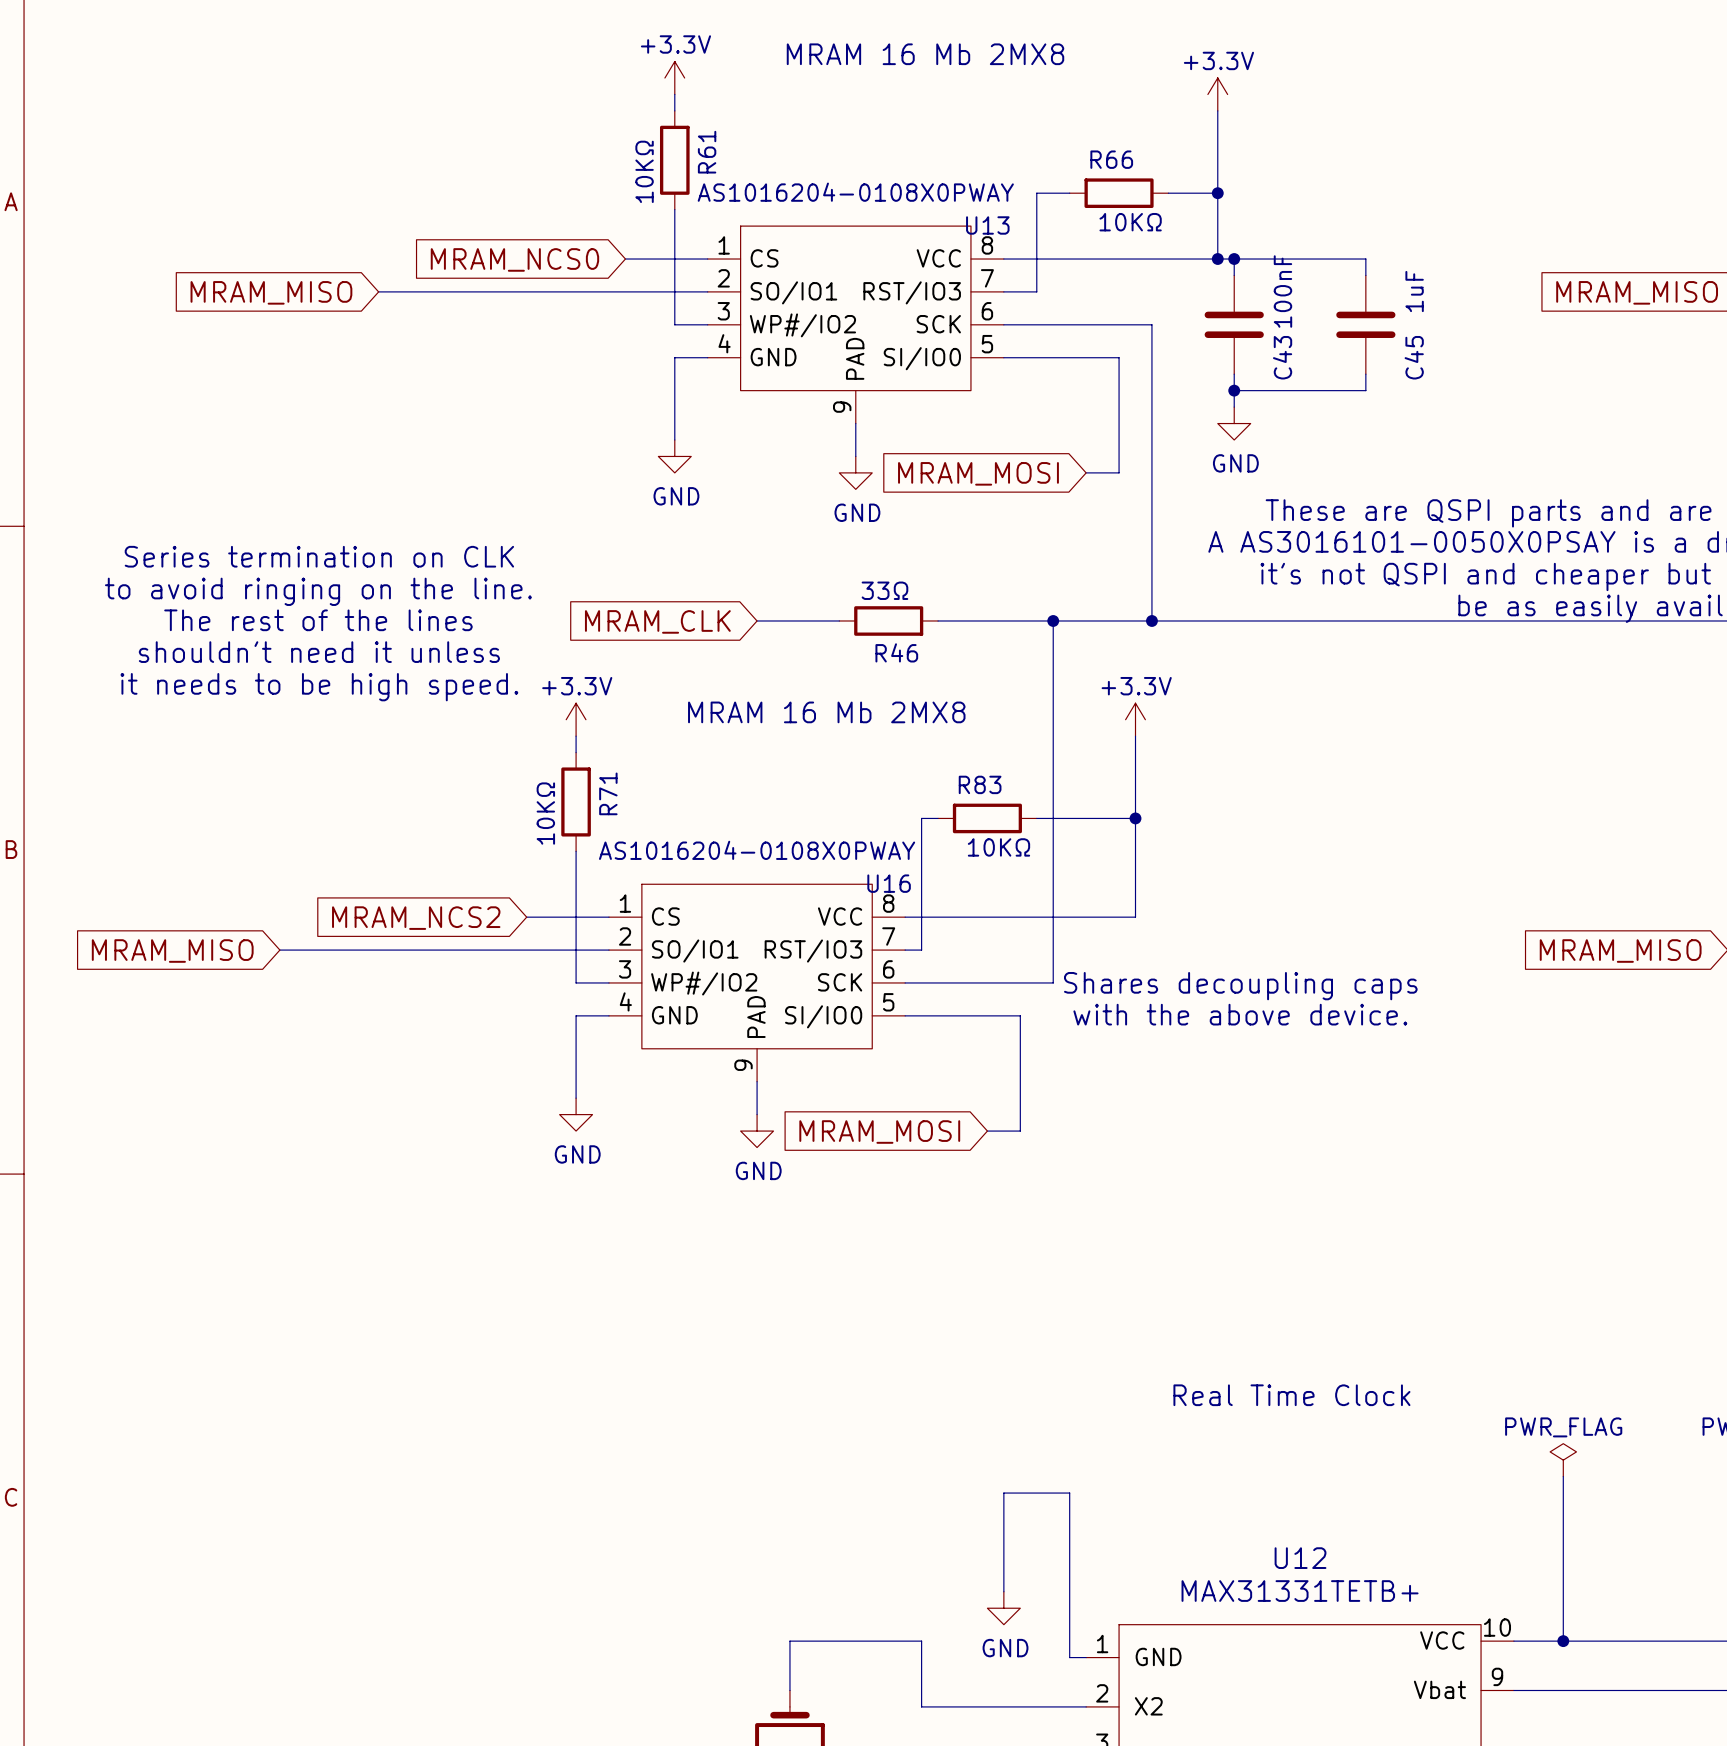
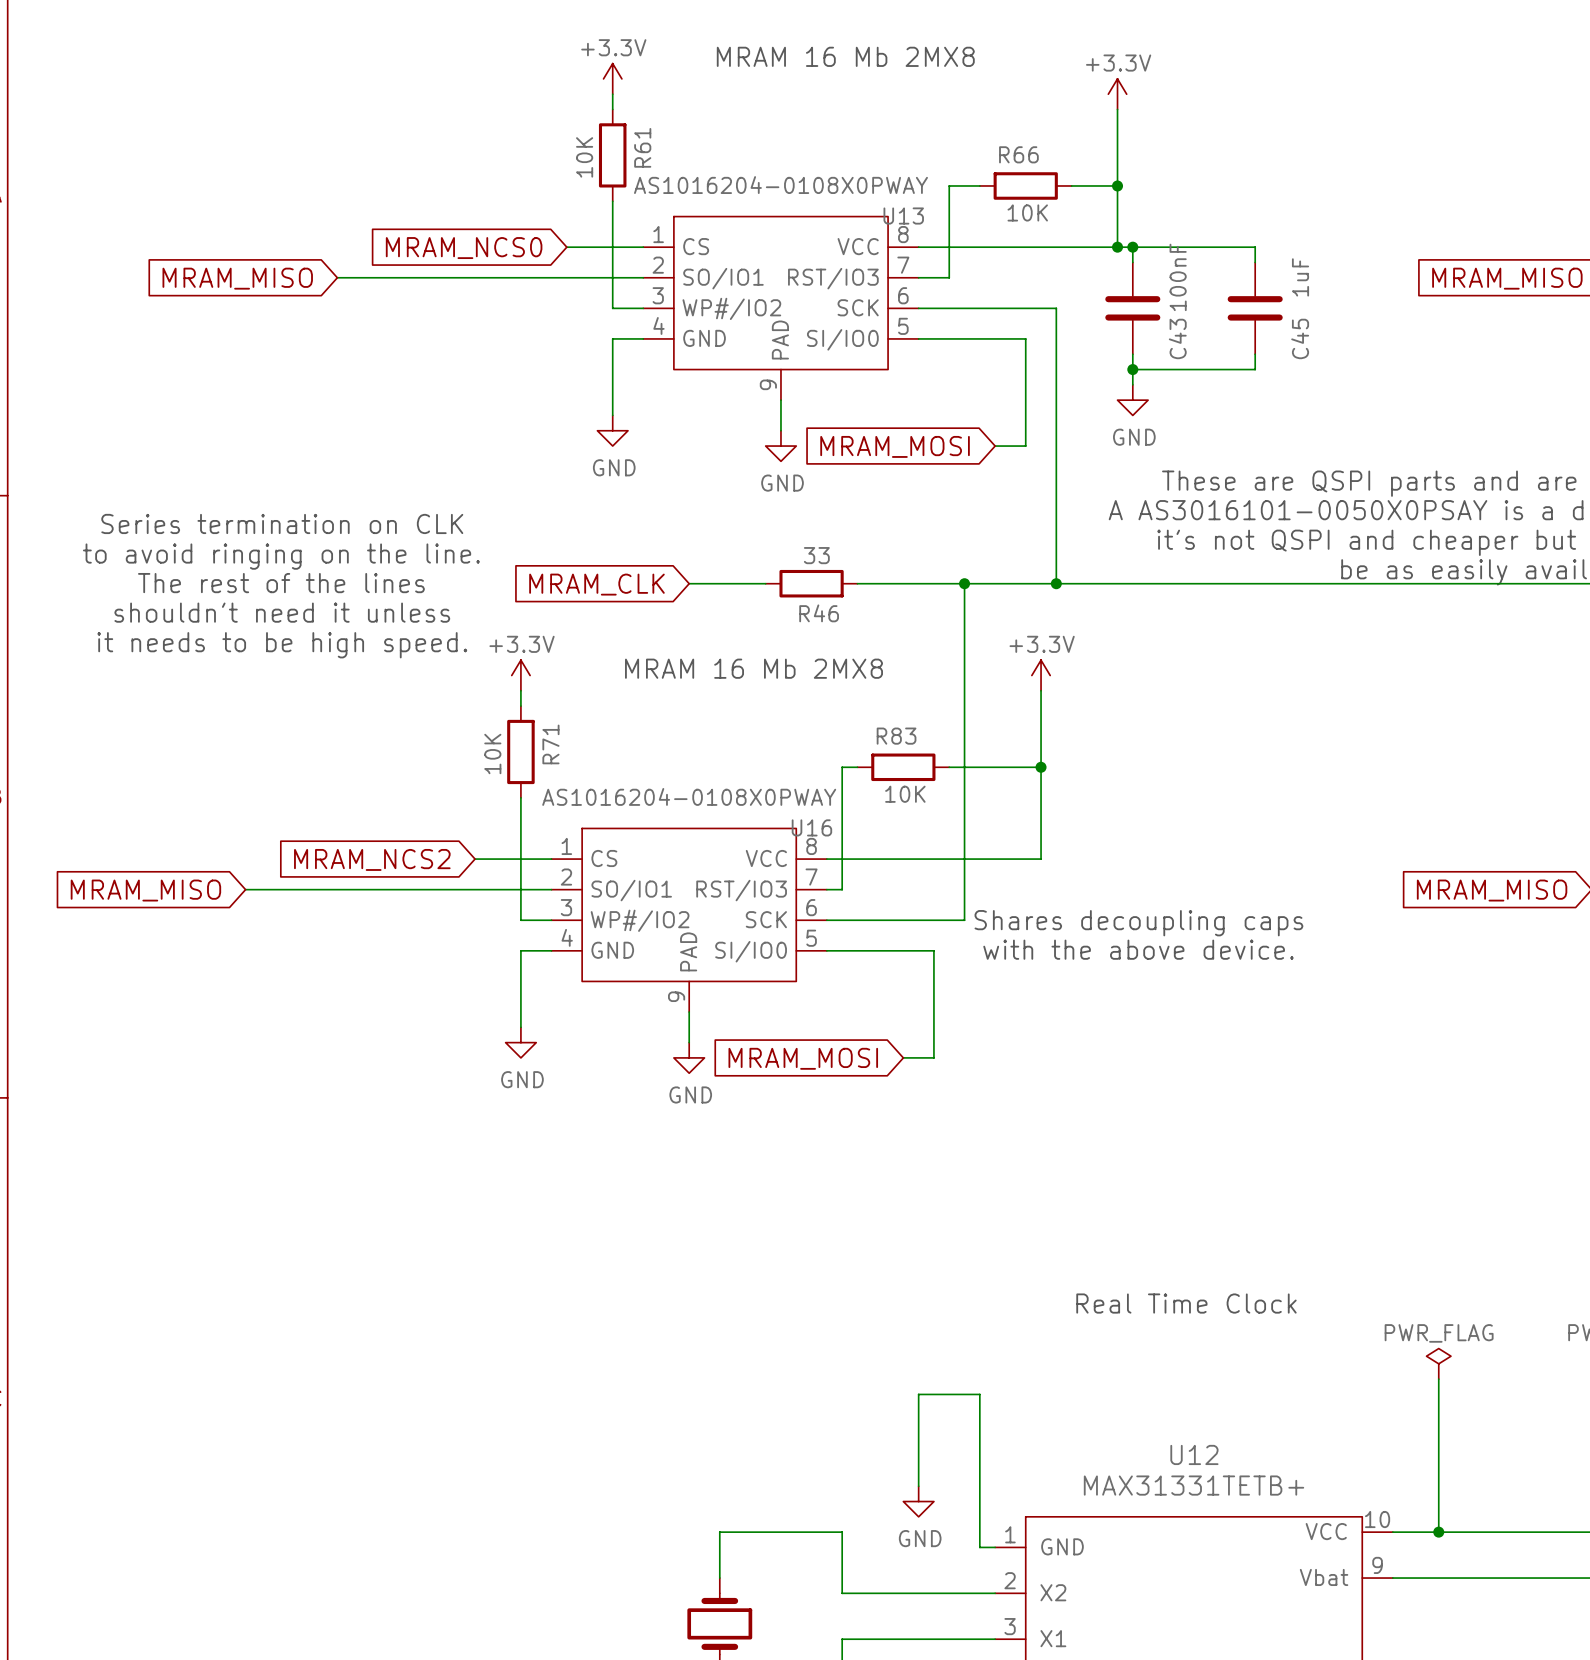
R61 value: 10KΩ (644, 171) -> 10K (584, 157)
R66 value: 10KΩ (1130, 222) -> 10K (1027, 212)
R46 value: 33Ω (884, 590) -> 33 (816, 555)
R71 value: 10KΩ (545, 813) -> 10K (492, 753)
R83 value: 10KΩ (998, 847) -> 10K (905, 794)

